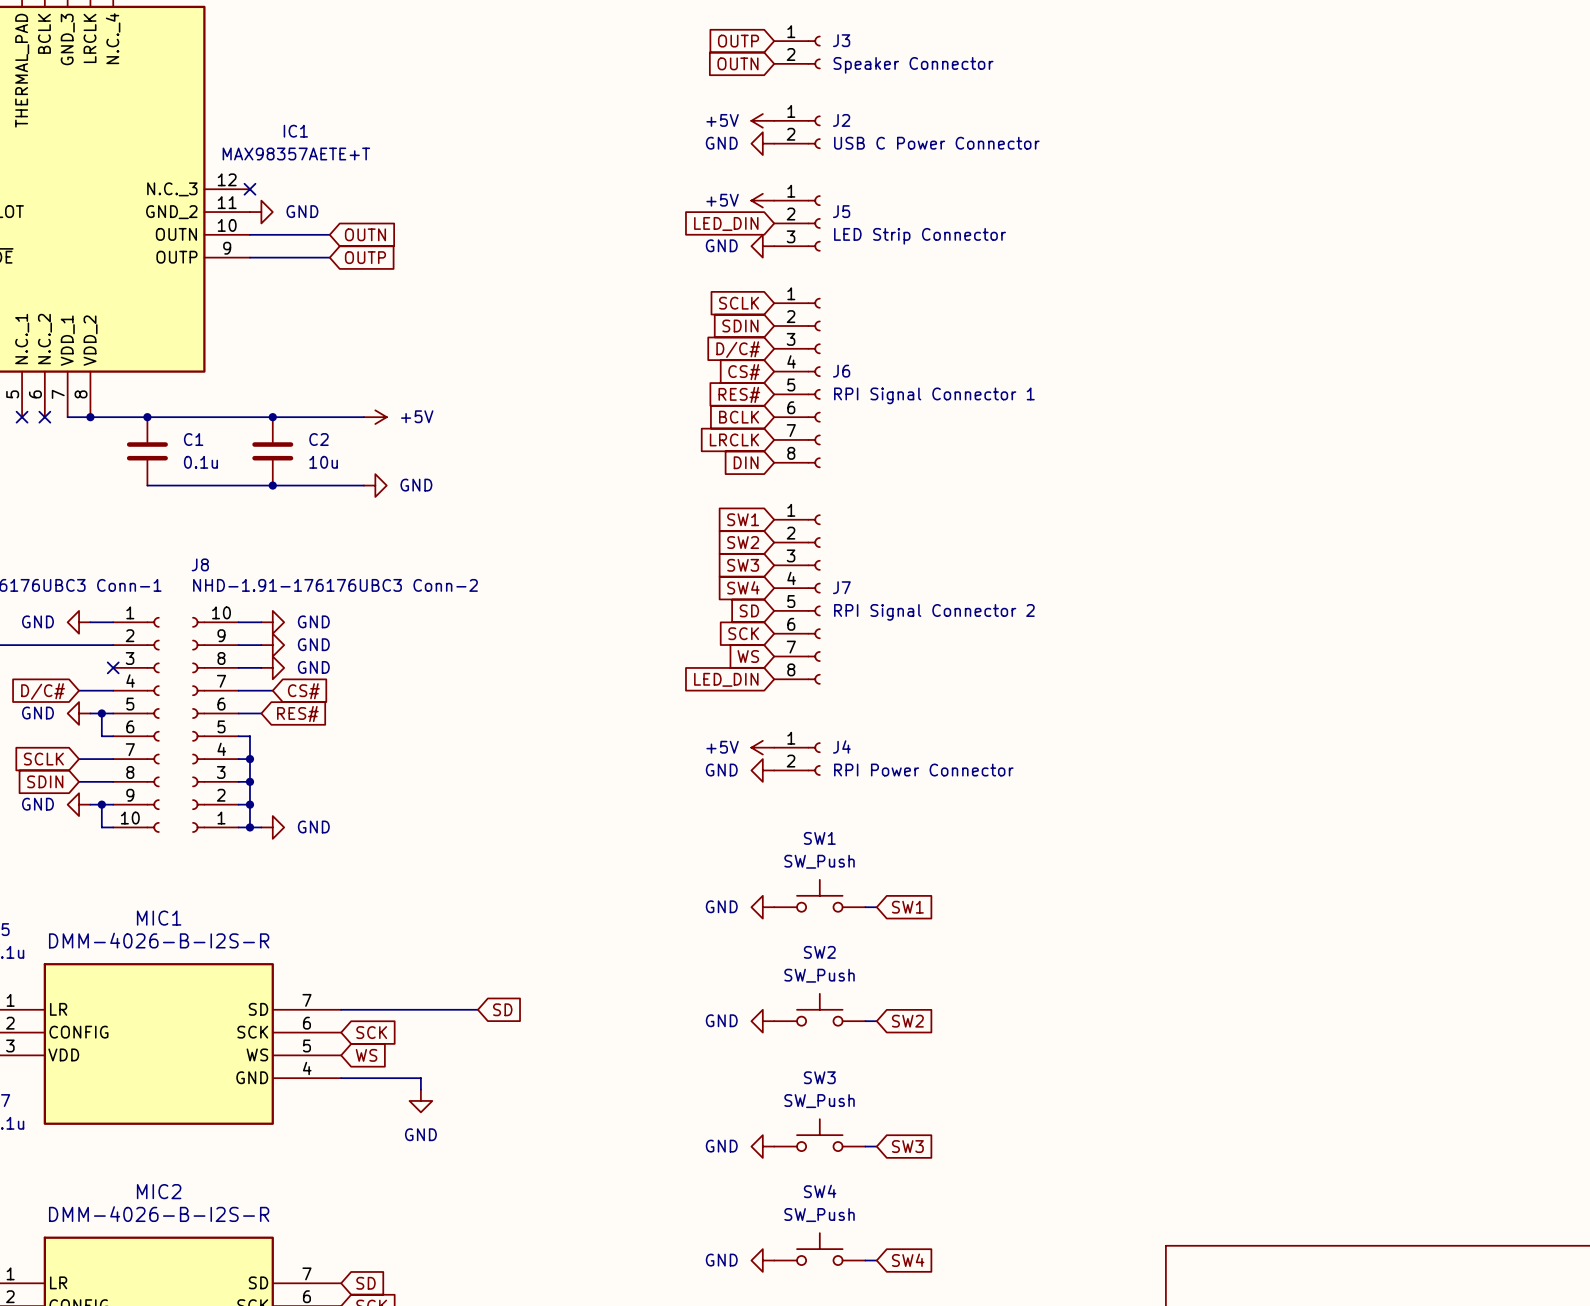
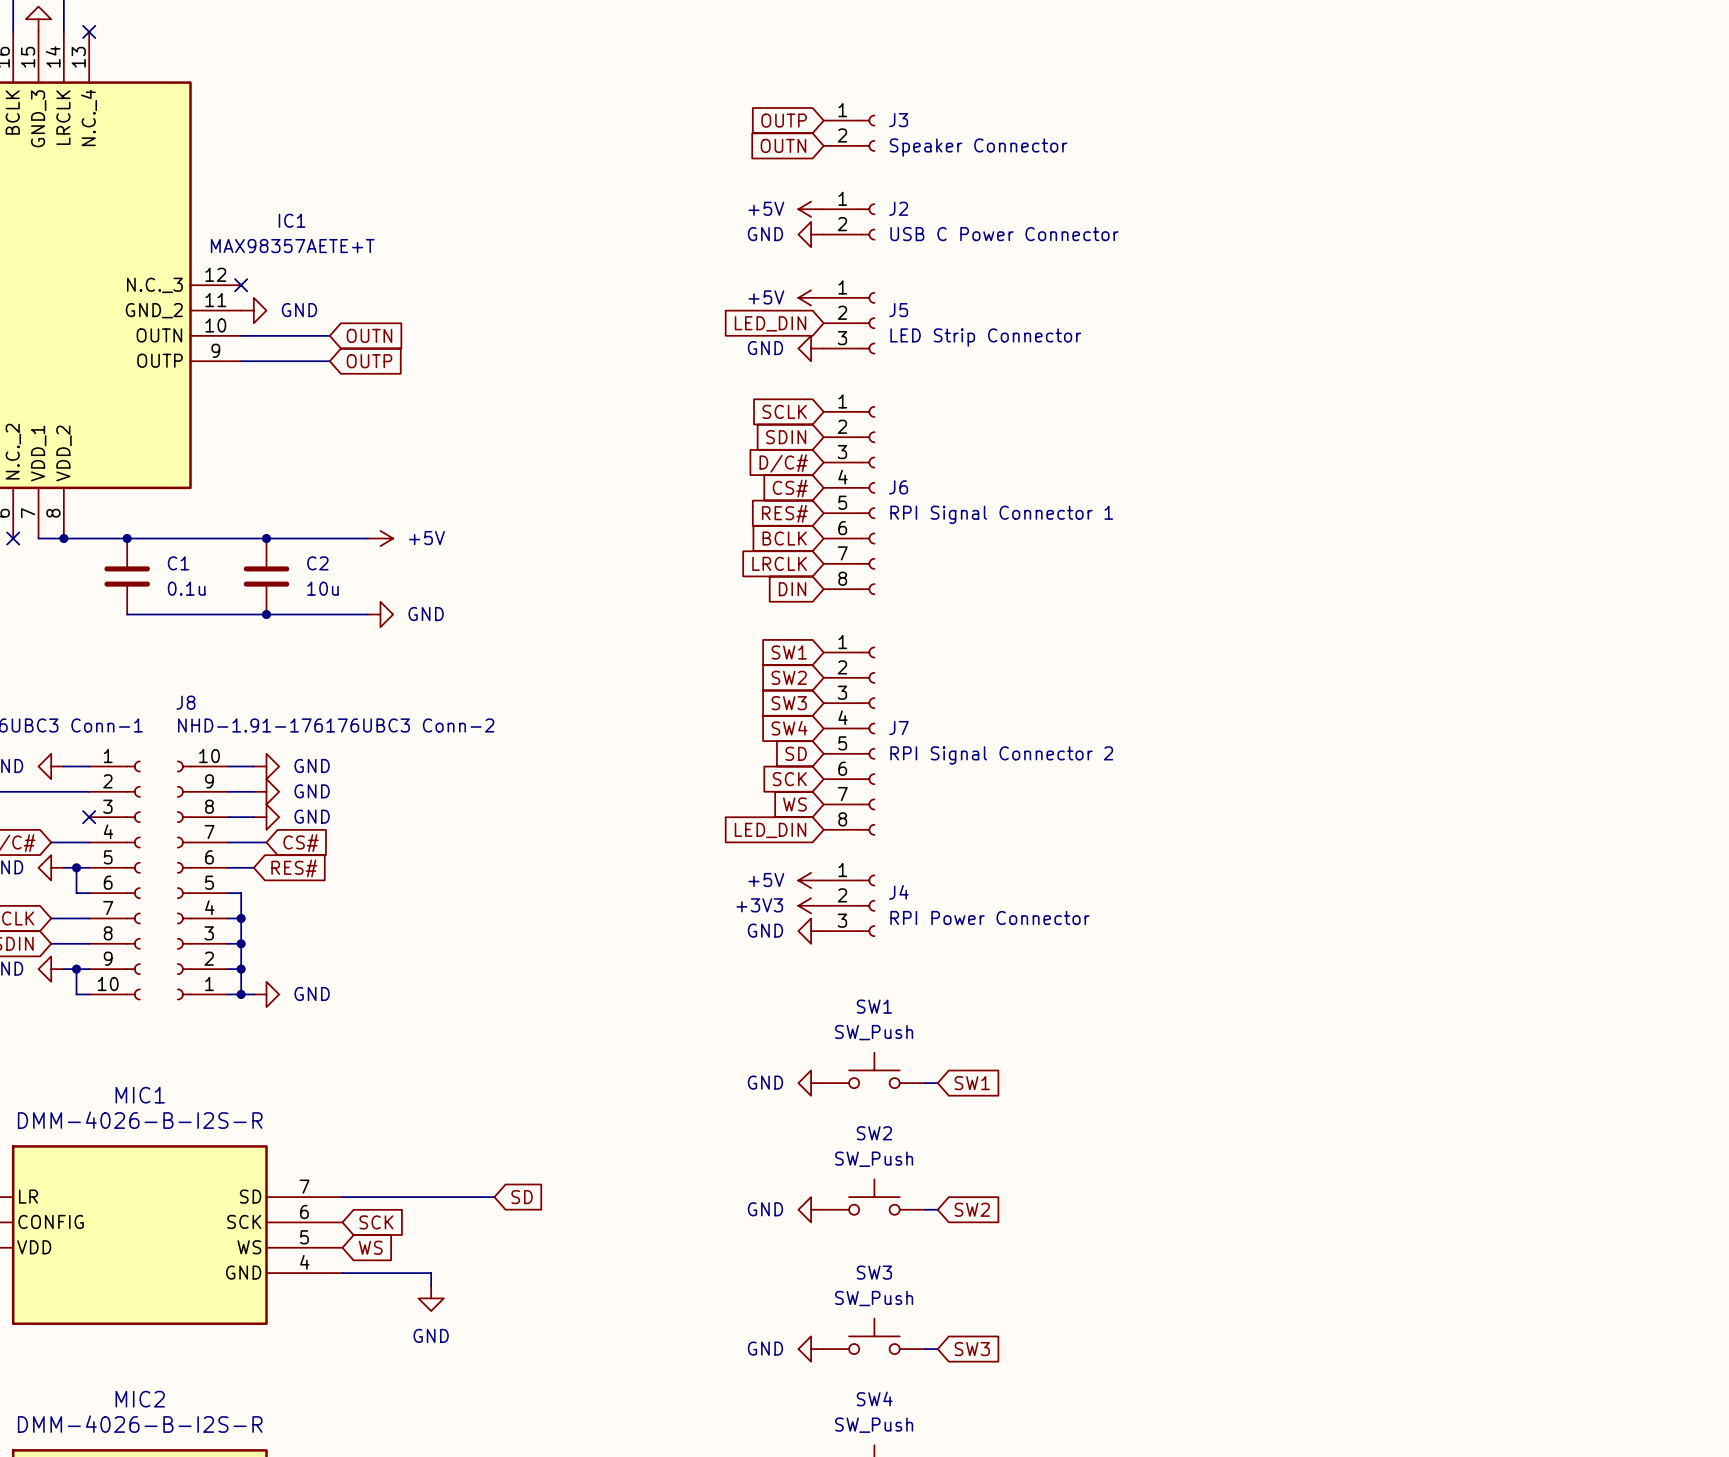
power symbol: none -> +5V (811, 880)
J4 symbol: [774, 742, 821, 776] -> [823, 874, 876, 937]
power symbol: +5V (762, 747) -> +3V3 (811, 905)

